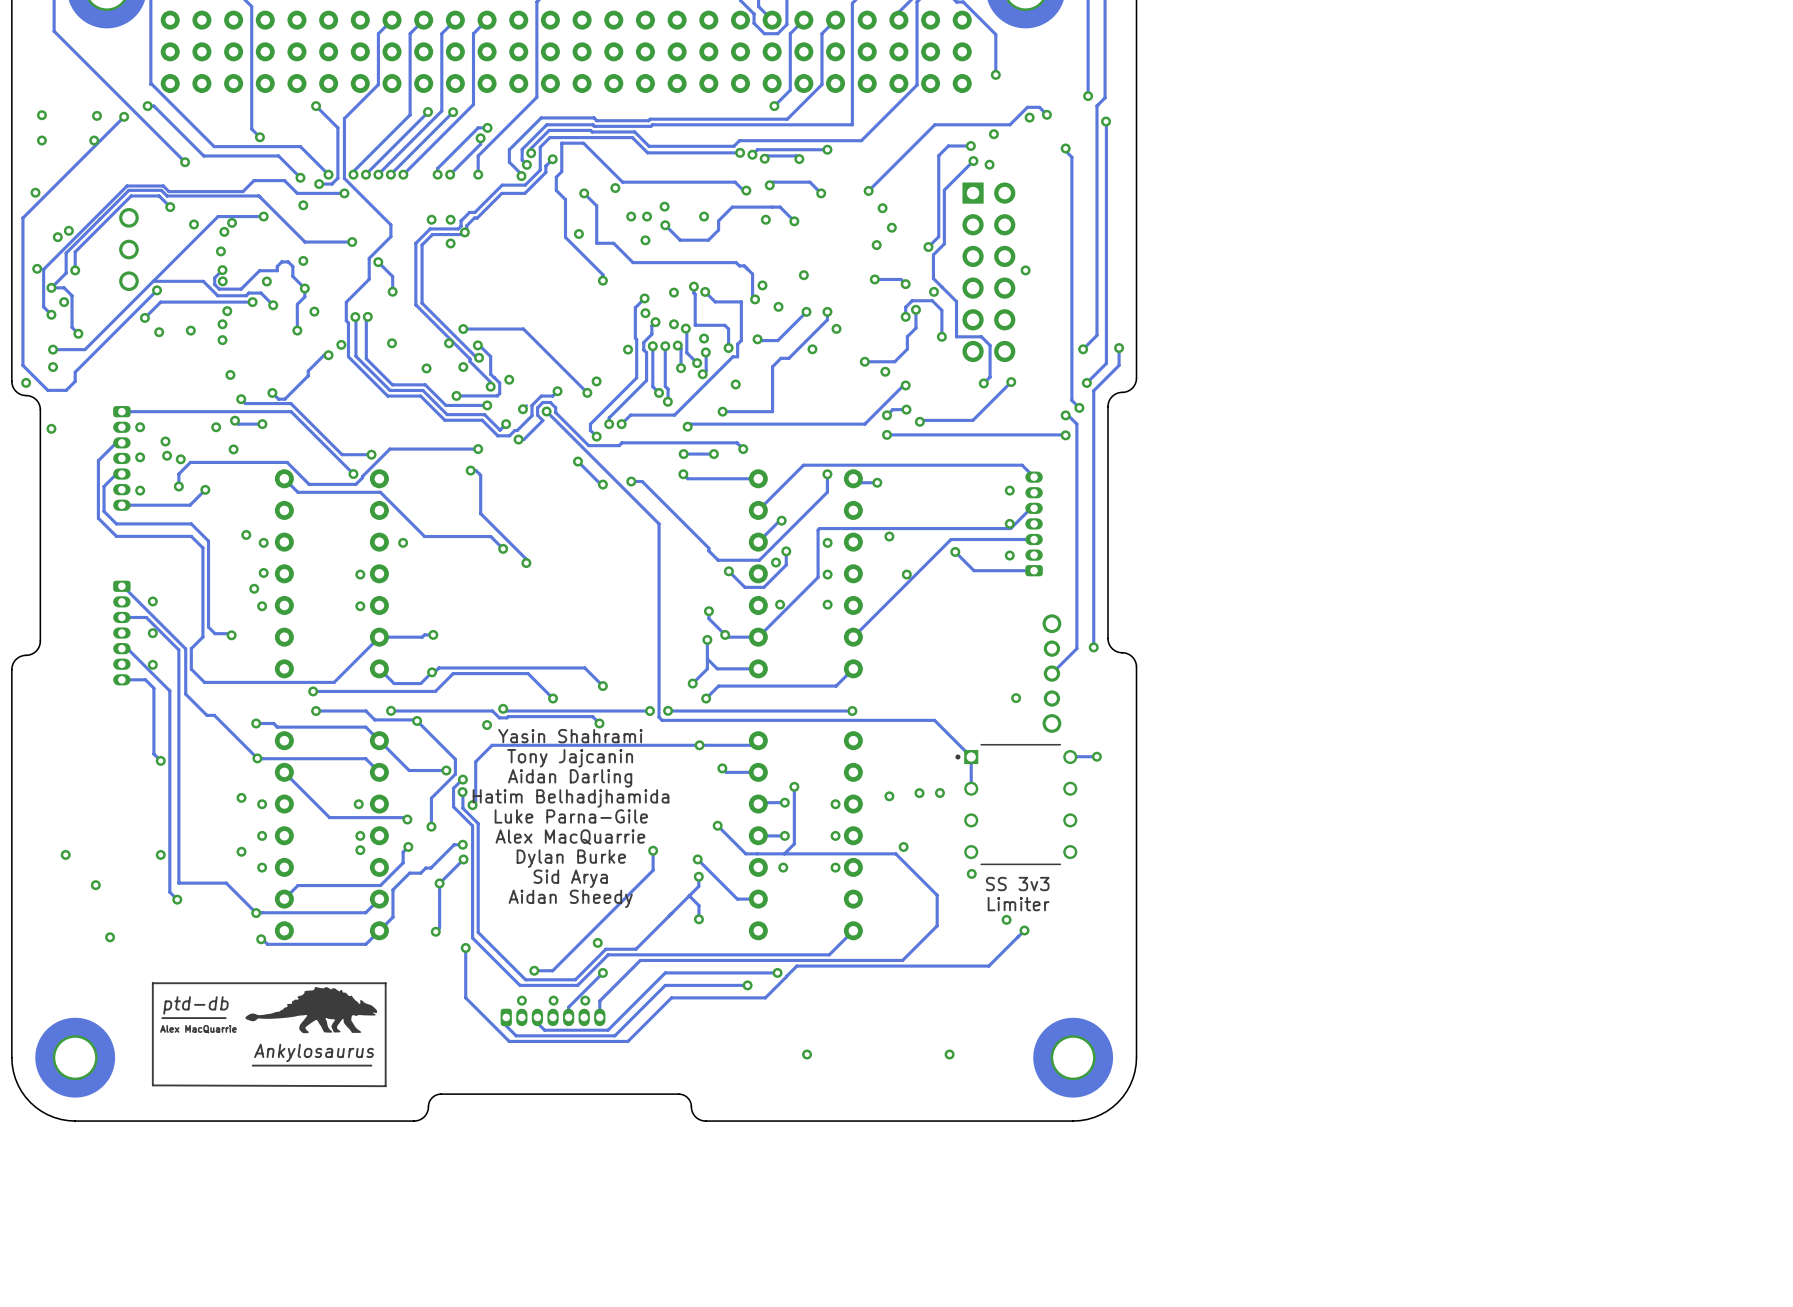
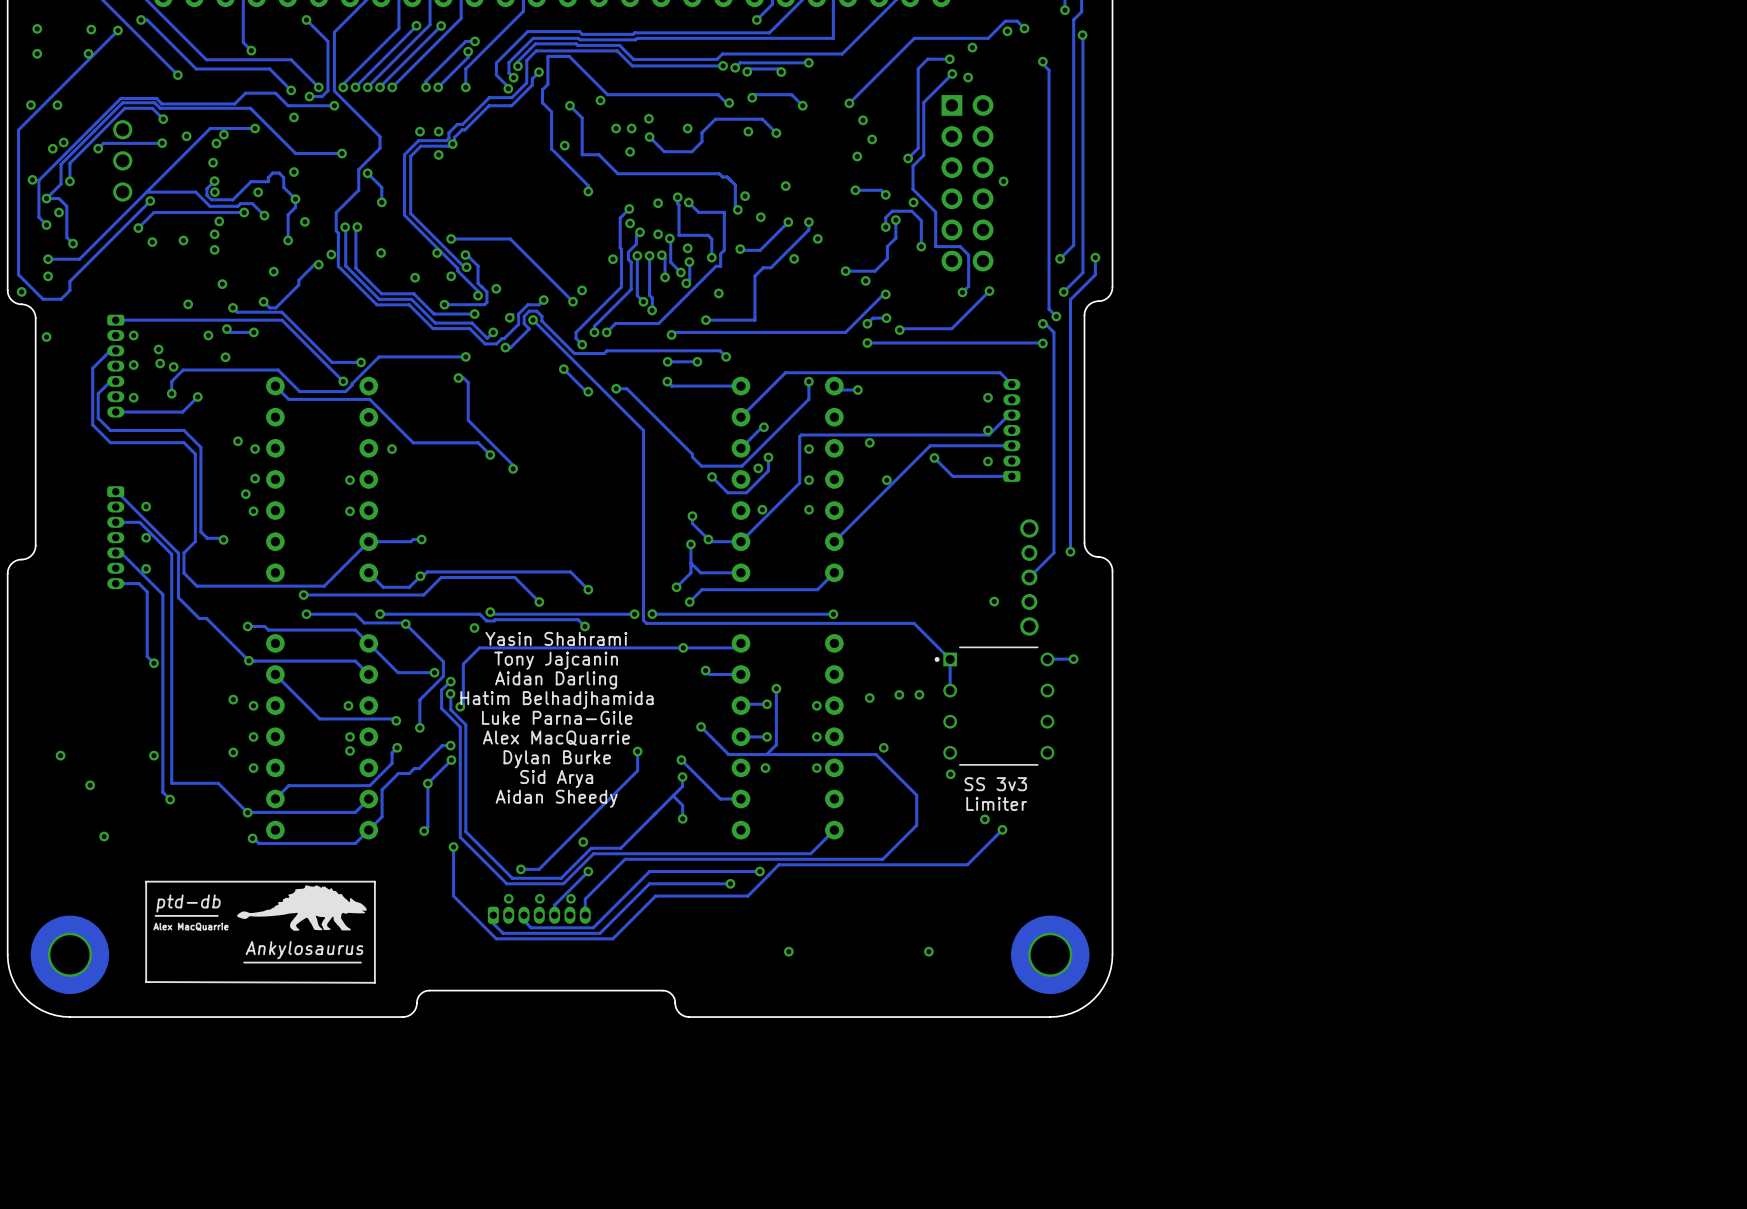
via: none -> (57, 105)
track: none -> (162, 143) (103, 143) (98, 148)
via: none -> (162, 143)
via: none -> (98, 148)
via: none -> (273, 271)
via: none -> (188, 304)

